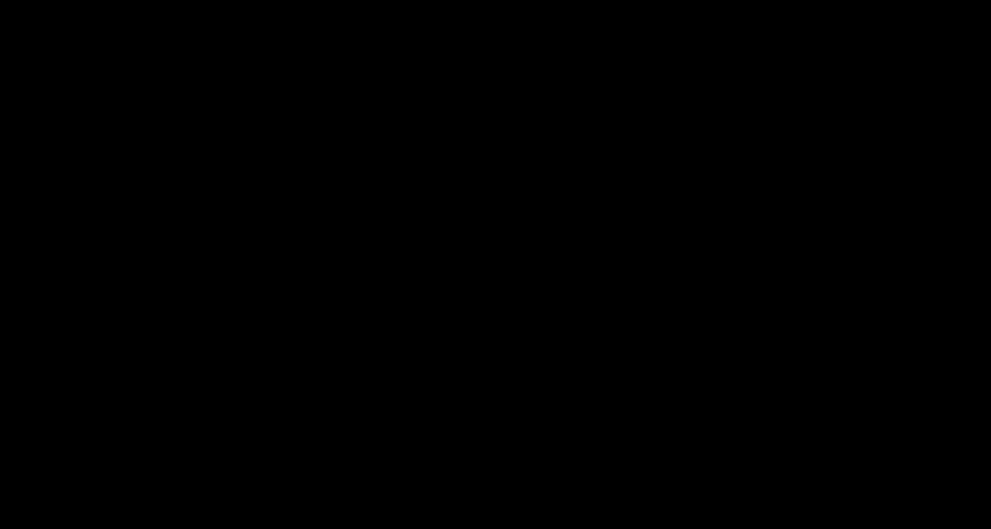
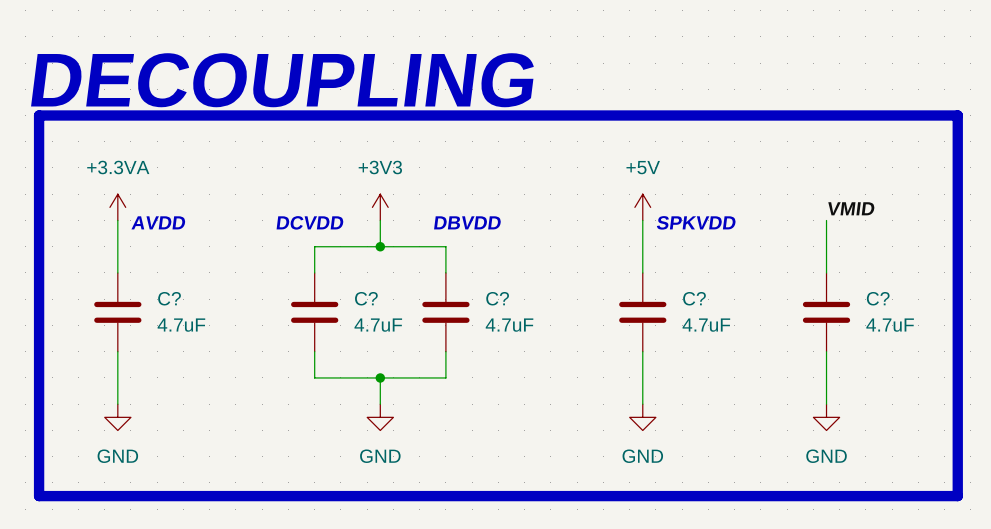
text: none -> DECOUPLING (282, 80)
line: none -> (39, 115) (39, 496) (957, 496) (957, 115) (39, 115)
power symbol: none -> +3.3VA (117, 207)
power symbol: none -> +3V3 (380, 207)
power symbol: none -> +5V (642, 207)
label: none -> VMID (851, 208)
wire: none -> (117, 220) (117, 272)
wire: none -> (380, 220) (380, 246)
wire: none -> (642, 220) (642, 272)
wire: none -> (826, 220) (826, 272)
text: none -> AVDD (158, 222)
text: none -> DCVDD (310, 222)
text: none -> DBVDD (467, 222)
text: none -> SPKVDD (696, 222)
junction: none -> (380, 246)
wire: none -> (314, 272) (314, 246) (445, 246) (445, 272)
C?: none -> 4.7uF (117, 312)
C?: none -> 4.7uF (314, 312)
C?: none -> 4.7uF (445, 312)
C?: none -> 4.7uF (642, 312)
C?: none -> 4.7uF (826, 312)
wire: none -> (117, 351) (117, 404)
wire: none -> (314, 351) (314, 377) (445, 377) (445, 351)
wire: none -> (642, 351) (642, 404)
wire: none -> (826, 351) (826, 404)
wire: none -> (380, 377) (380, 404)
junction: none -> (380, 377)
power symbol: none -> GND (117, 417)
power symbol: none -> GND (380, 417)
power symbol: none -> GND (642, 417)
power symbol: none -> GND (826, 417)

